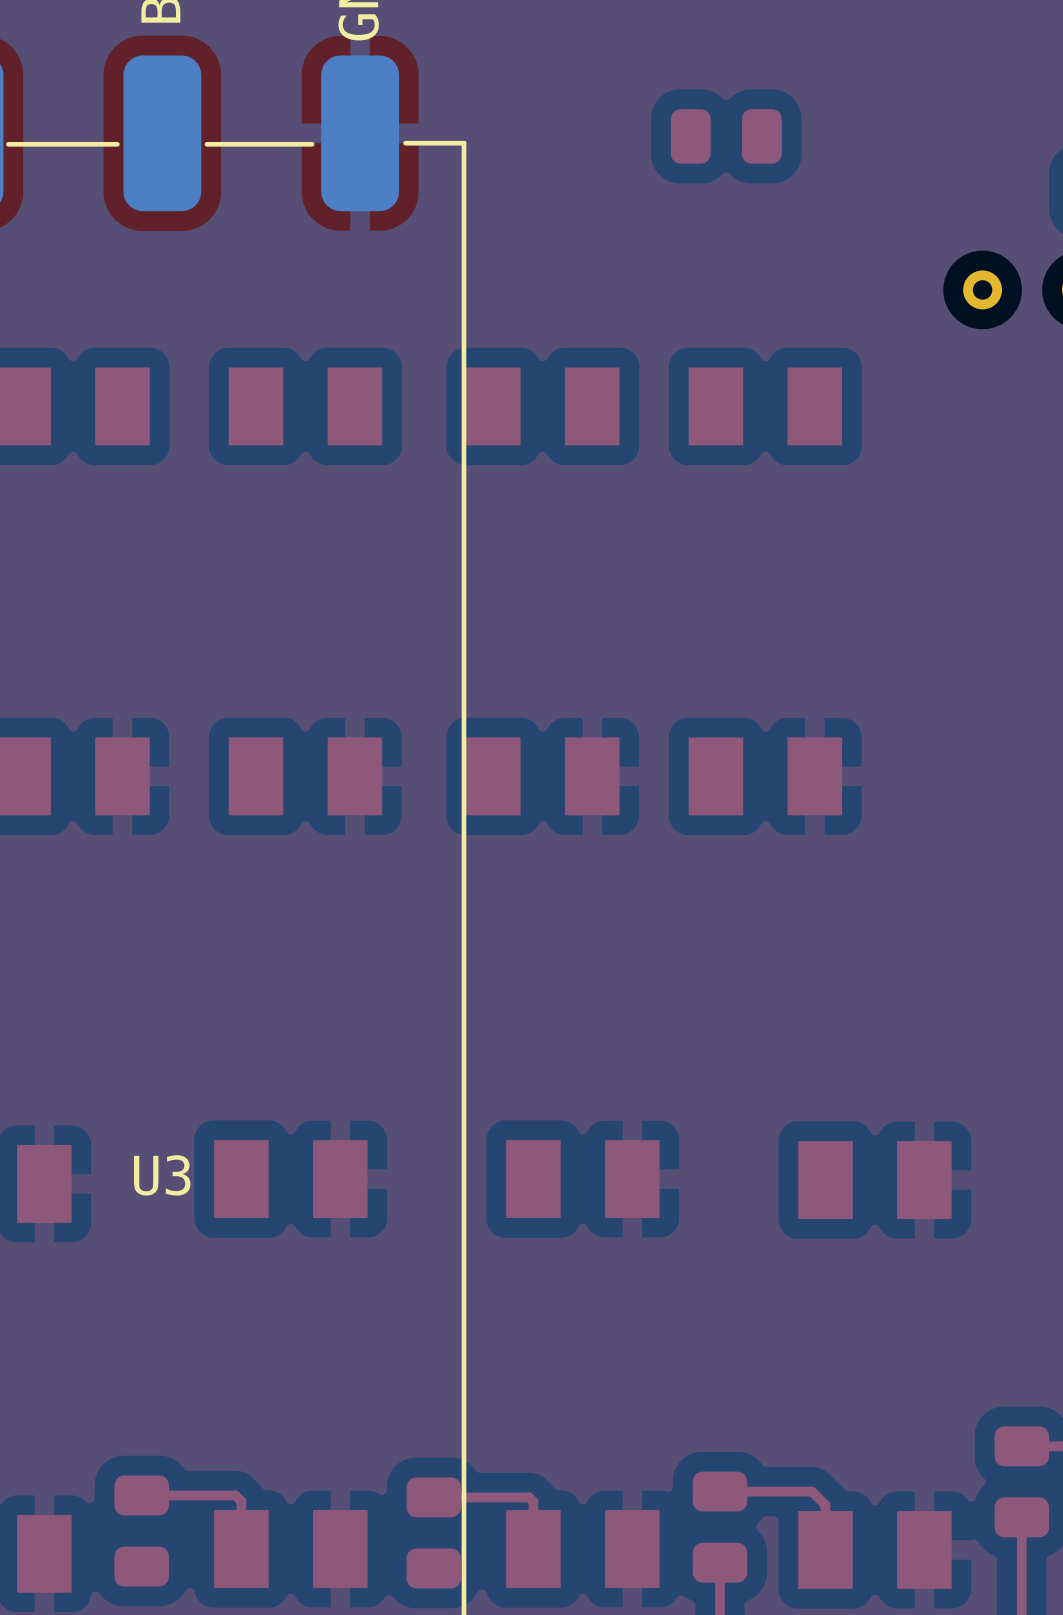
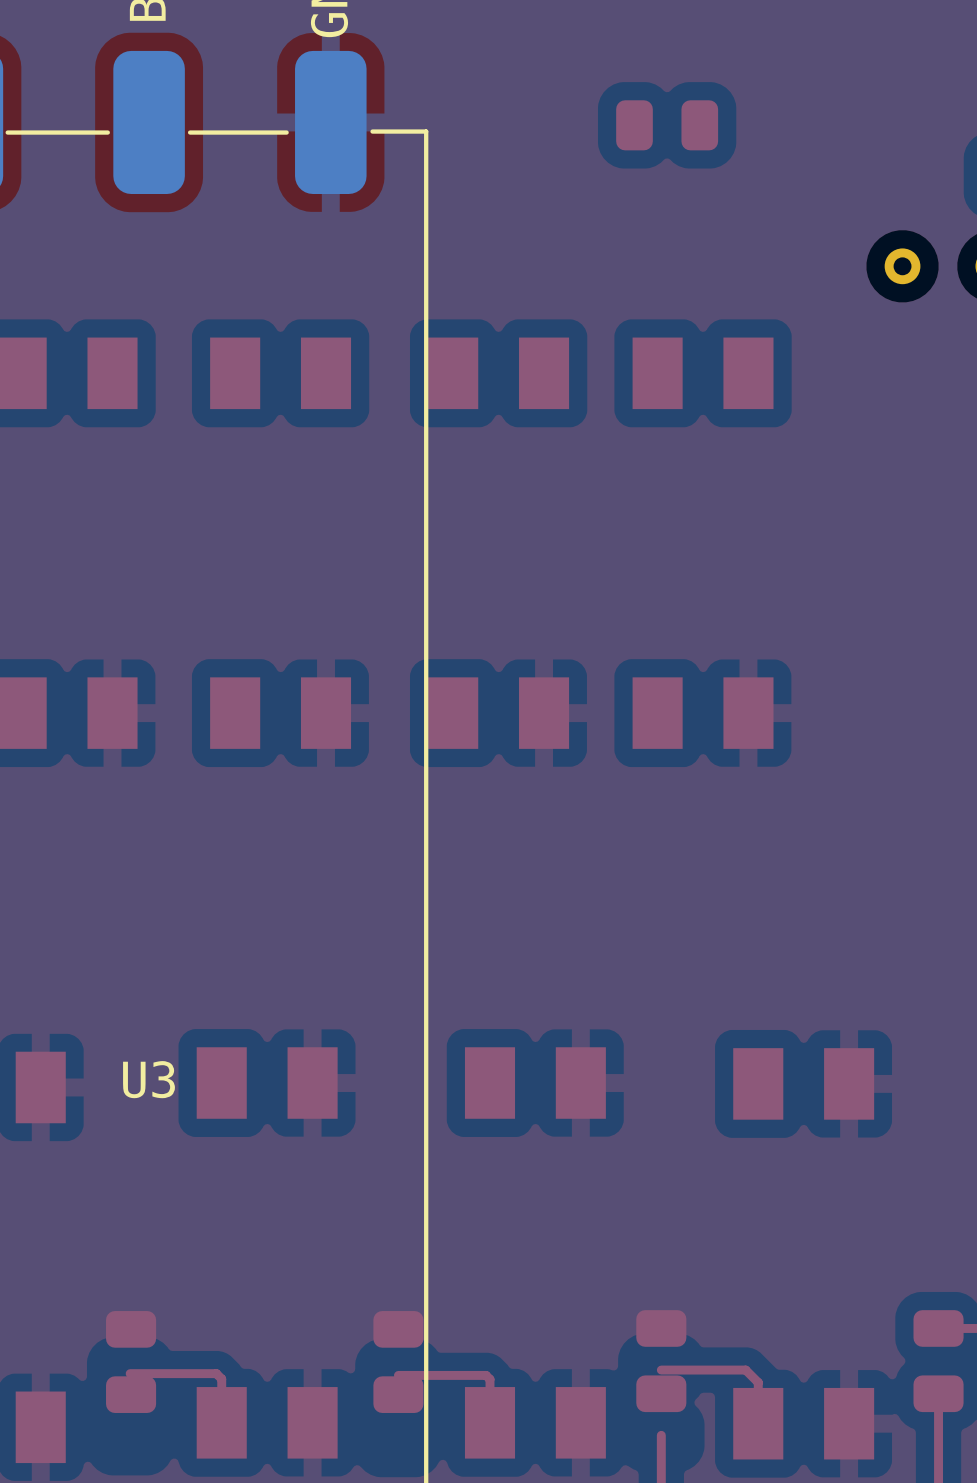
part position: (719, 1527) -> (661, 1361)
part position: (141, 1530) -> (131, 1362)
part position: (433, 1532) -> (398, 1362)

